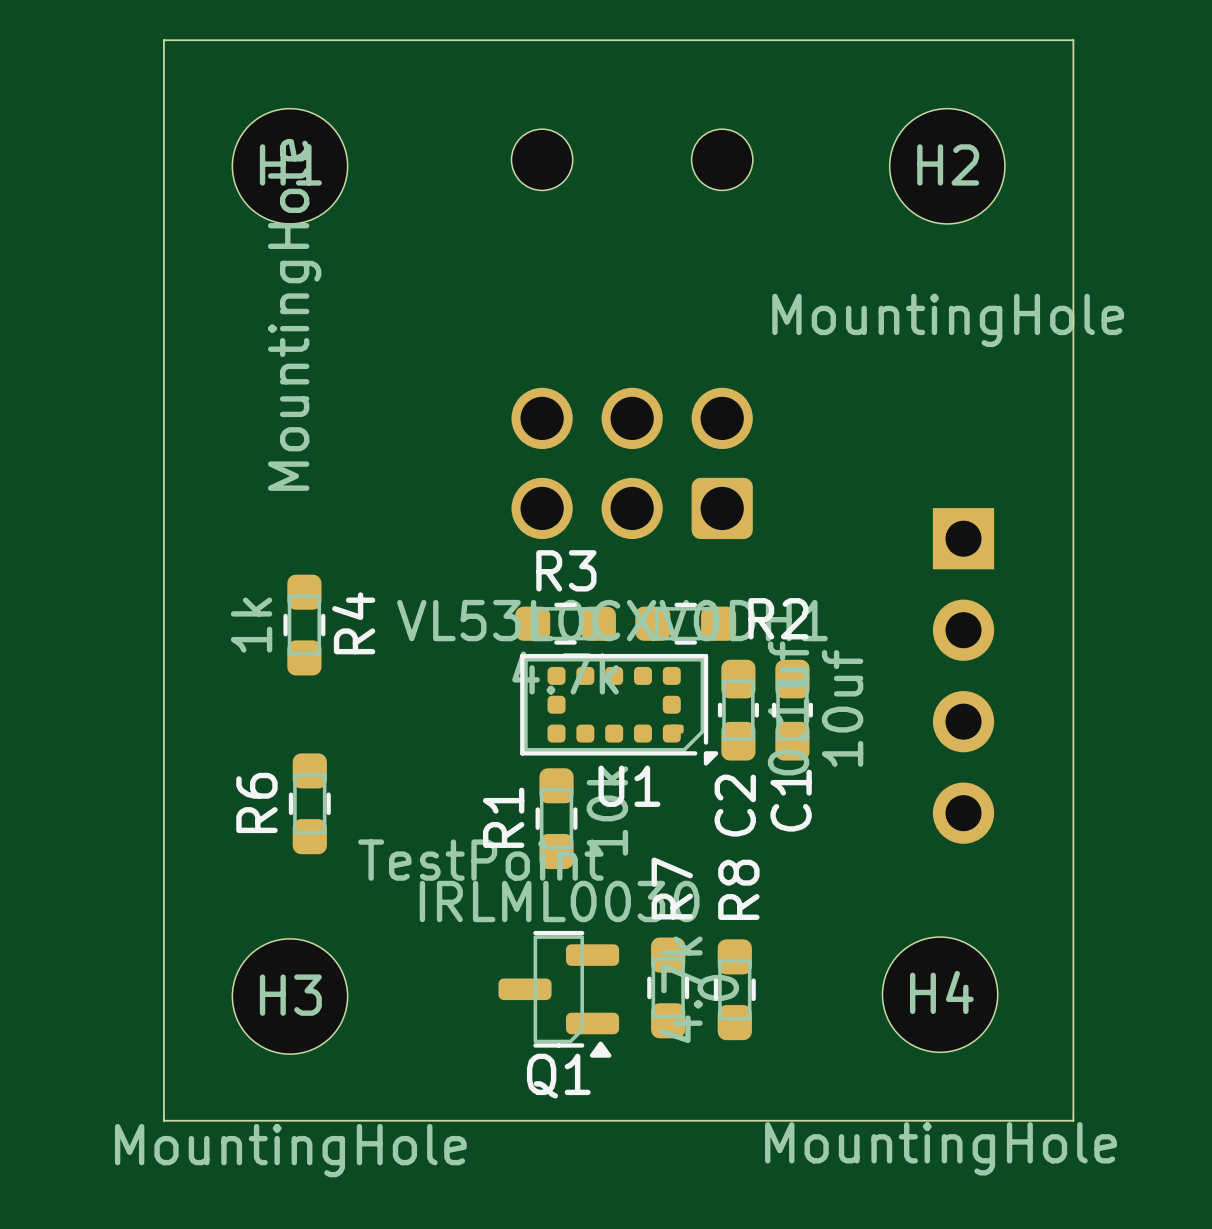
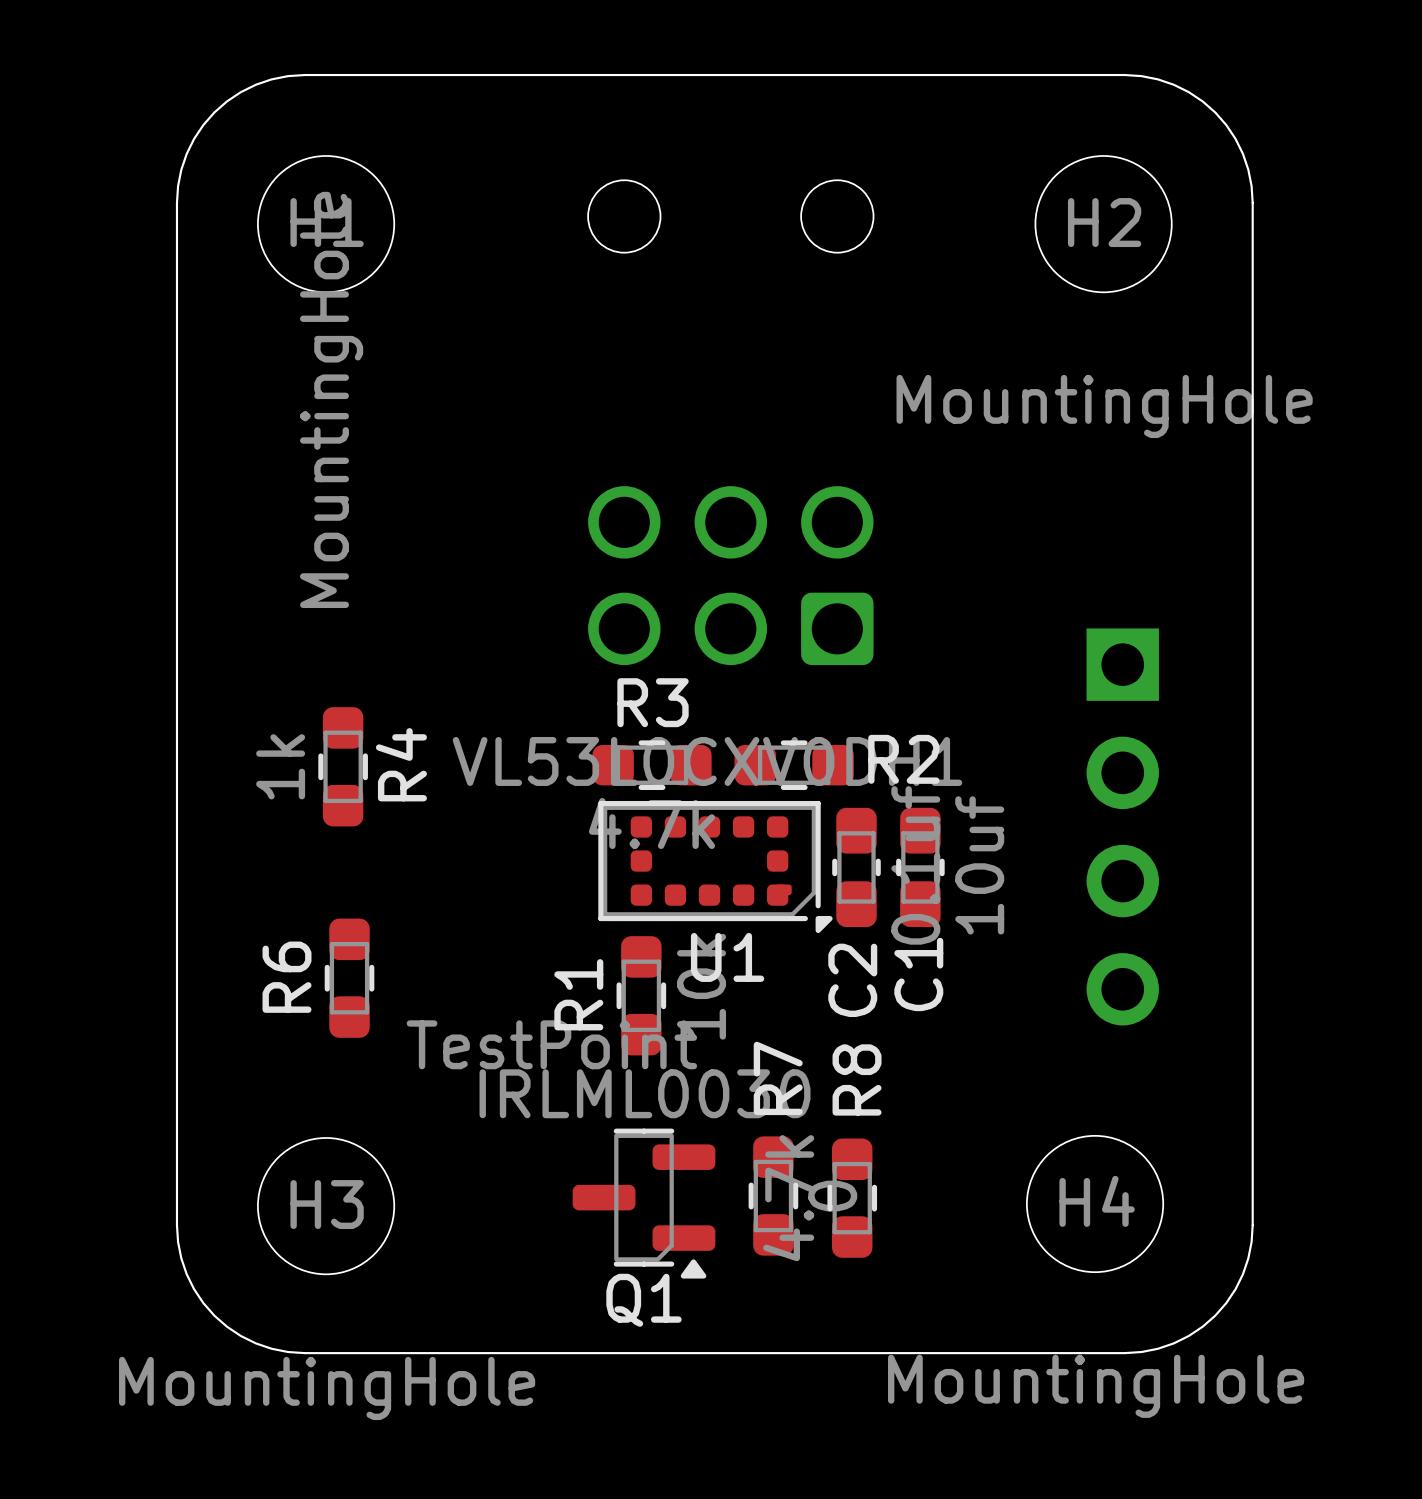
board edge: (271, 40) (163, 40) (163, 148) -> (304, 75) (271, 79) (255, 84) (226, 101) (214, 112) (203, 125) (186, 153) (181, 169) (176, 202)
board edge: (965, 40) (1073, 40) (1073, 148) -> (1124, 75) (1141, 76) (1173, 84) (1202, 101) (1215, 112) (1226, 125) (1242, 153) (1248, 169) (1252, 202)
board edge: (163, 1012) (163, 1120) (271, 1120) -> (176, 1225) (178, 1241) (186, 1274) (194, 1289) (214, 1315) (226, 1326) (255, 1343) (288, 1352) (304, 1353)
board edge: (1073, 1012) (1073, 1120) (965, 1120) -> (1252, 1225) (1251, 1241) (1242, 1274) (1226, 1303) (1215, 1315) (1202, 1326) (1173, 1343) (1141, 1352) (1124, 1353)

